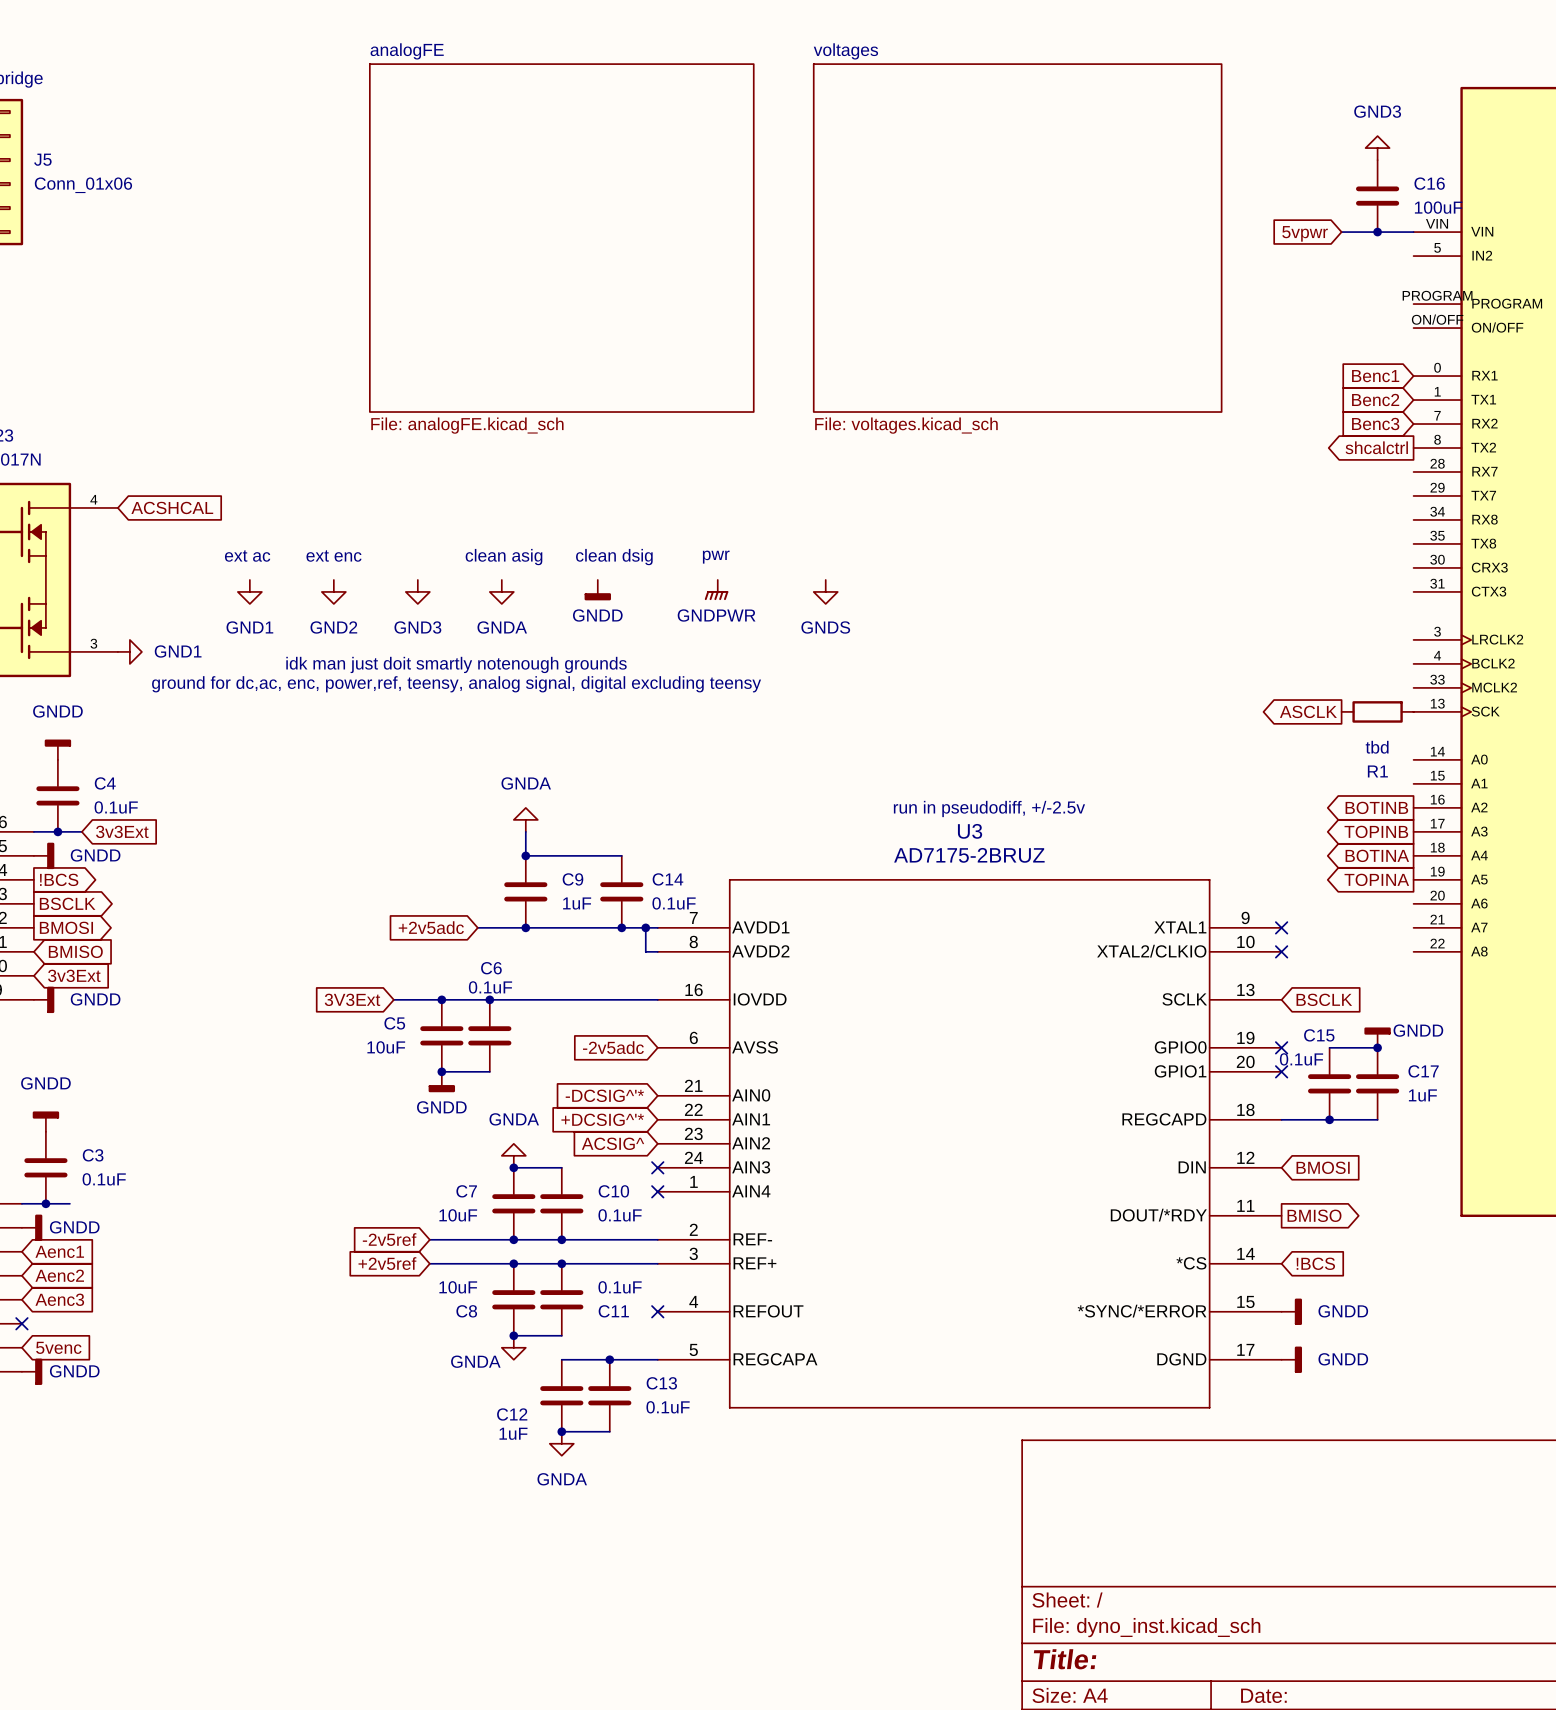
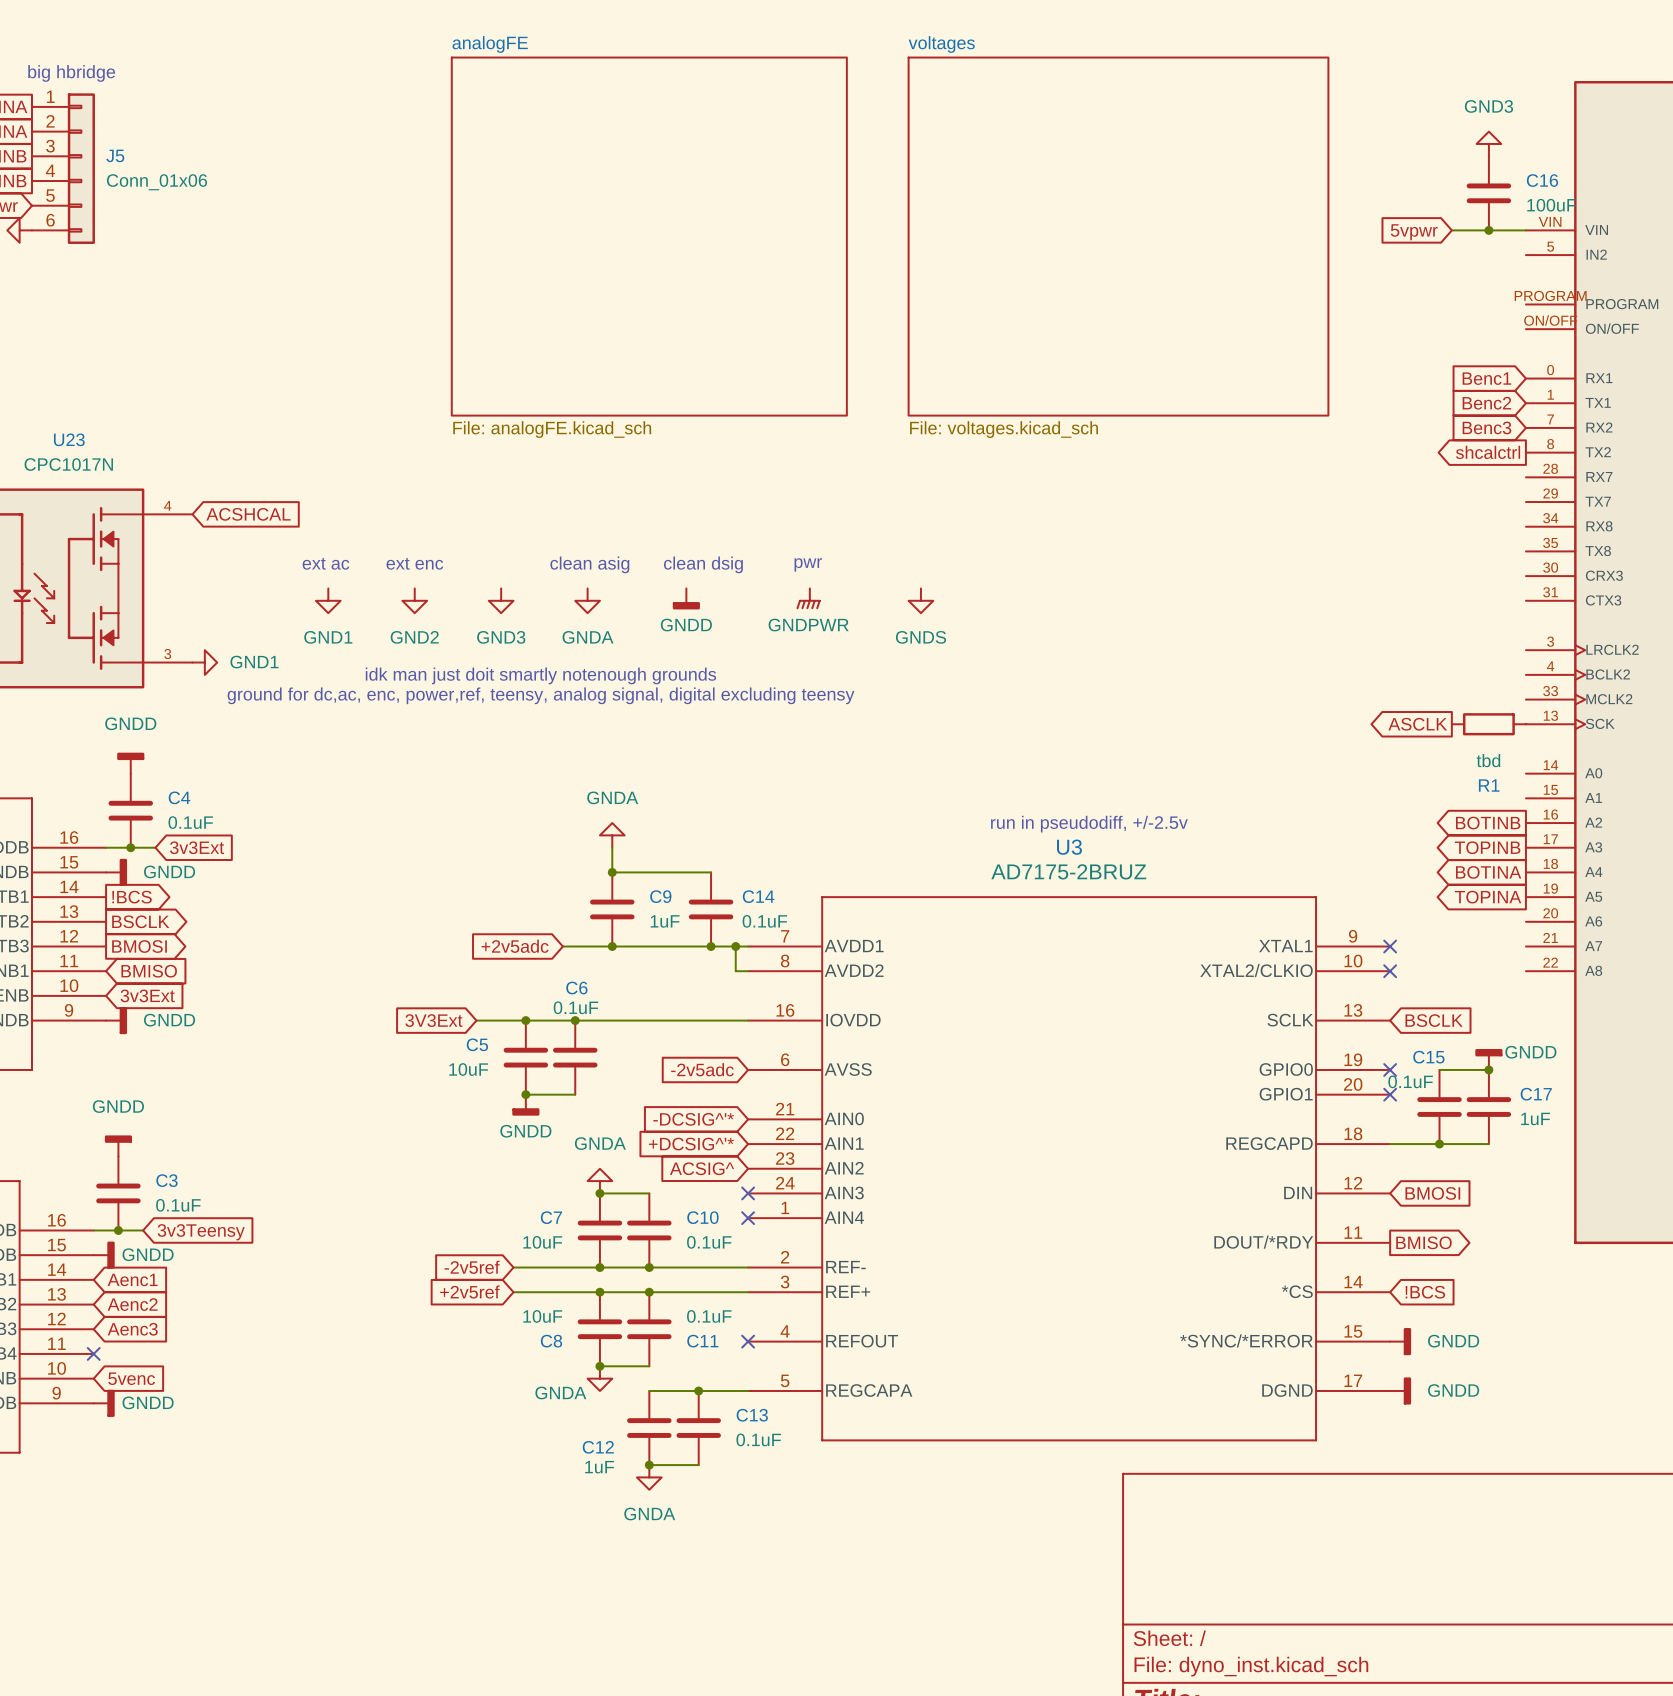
global label: none -> 3v3Teensy (201, 1232)

